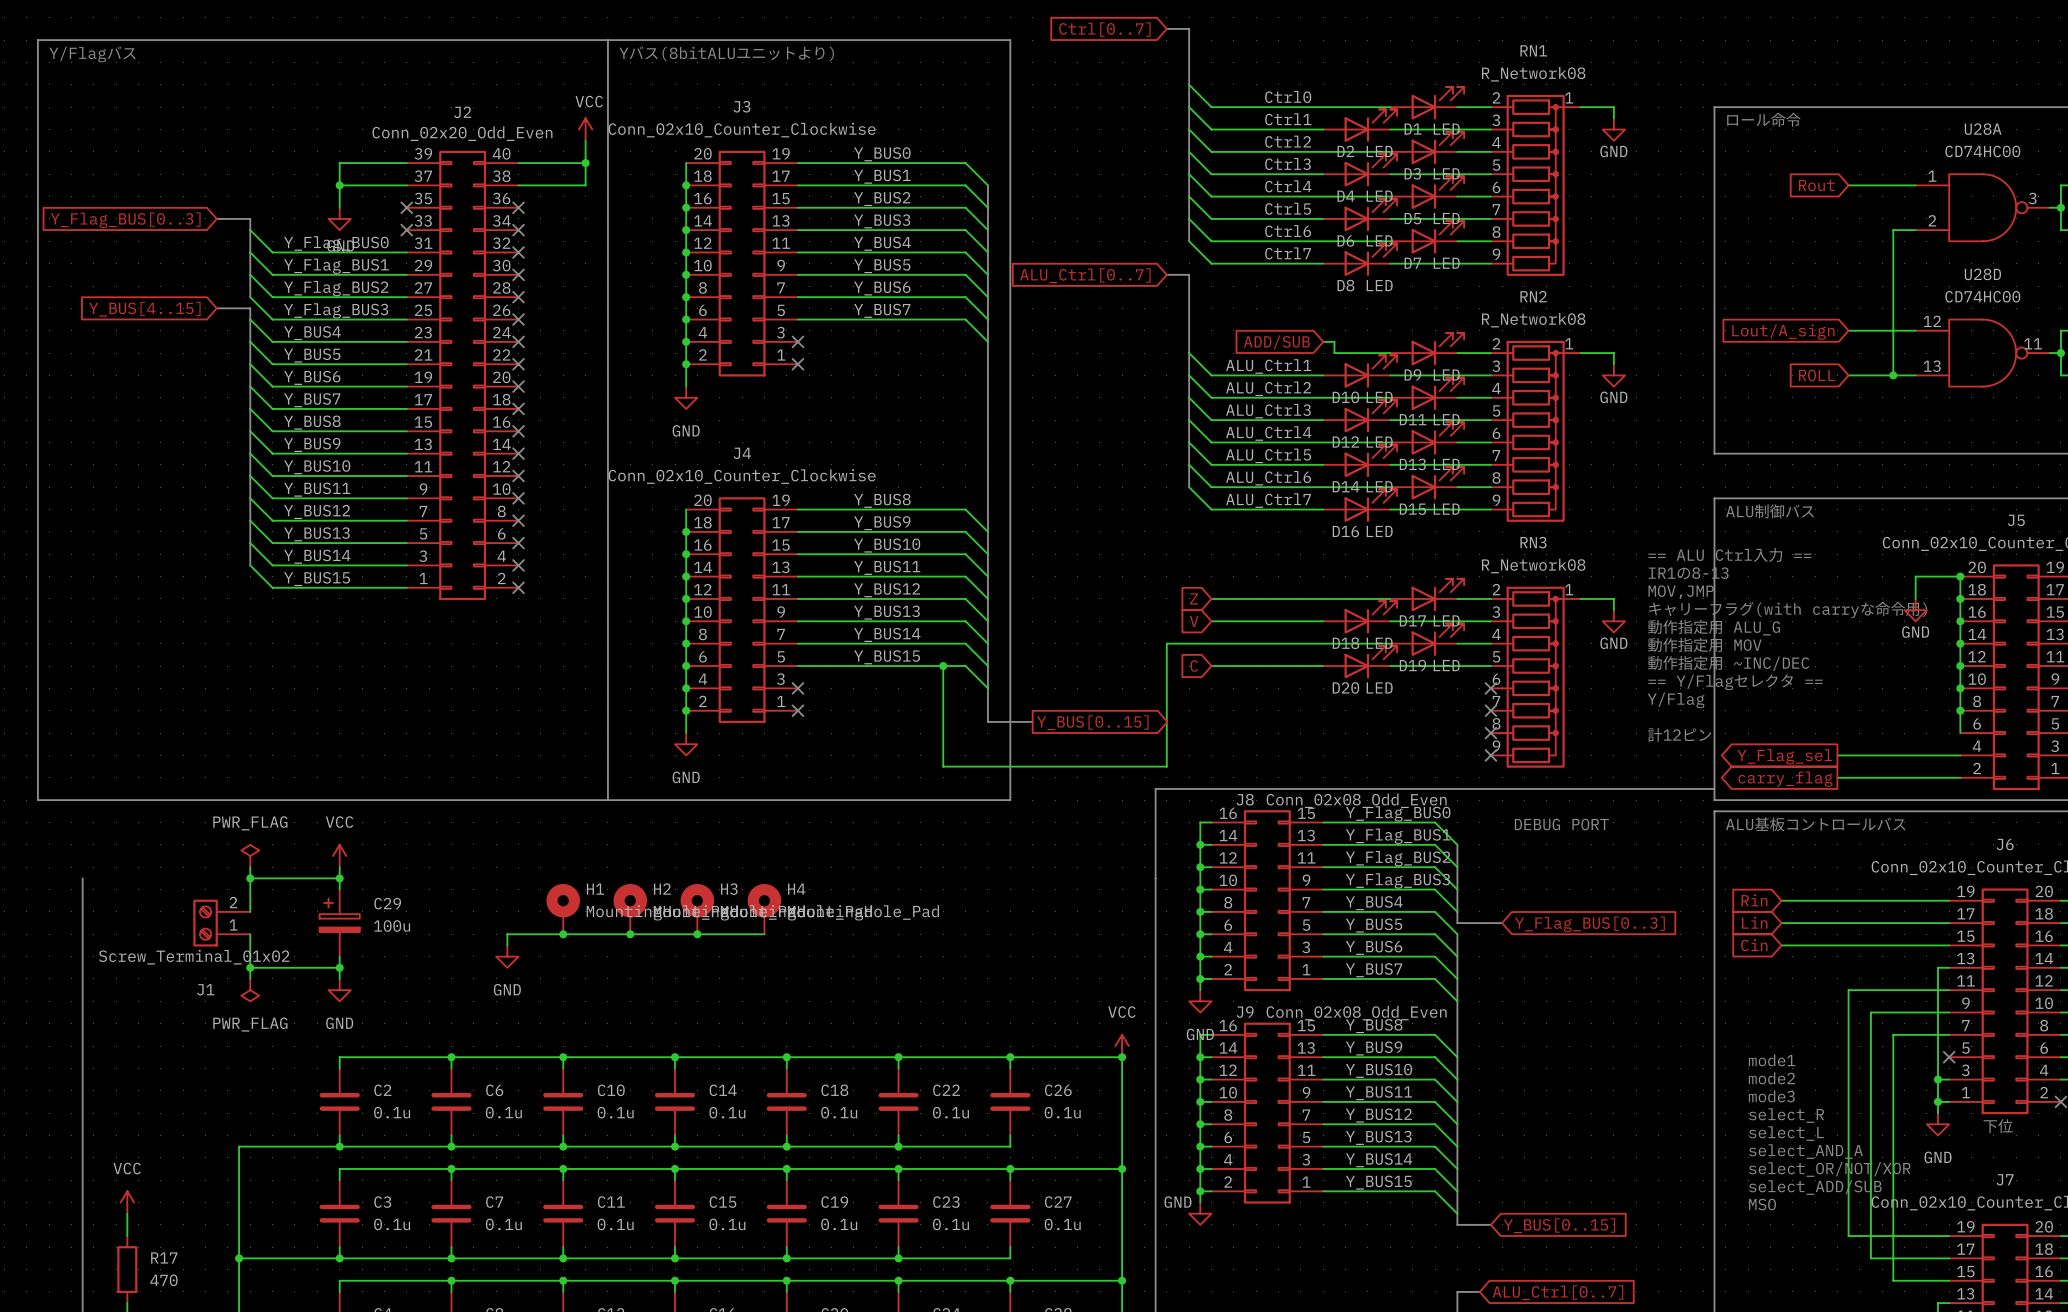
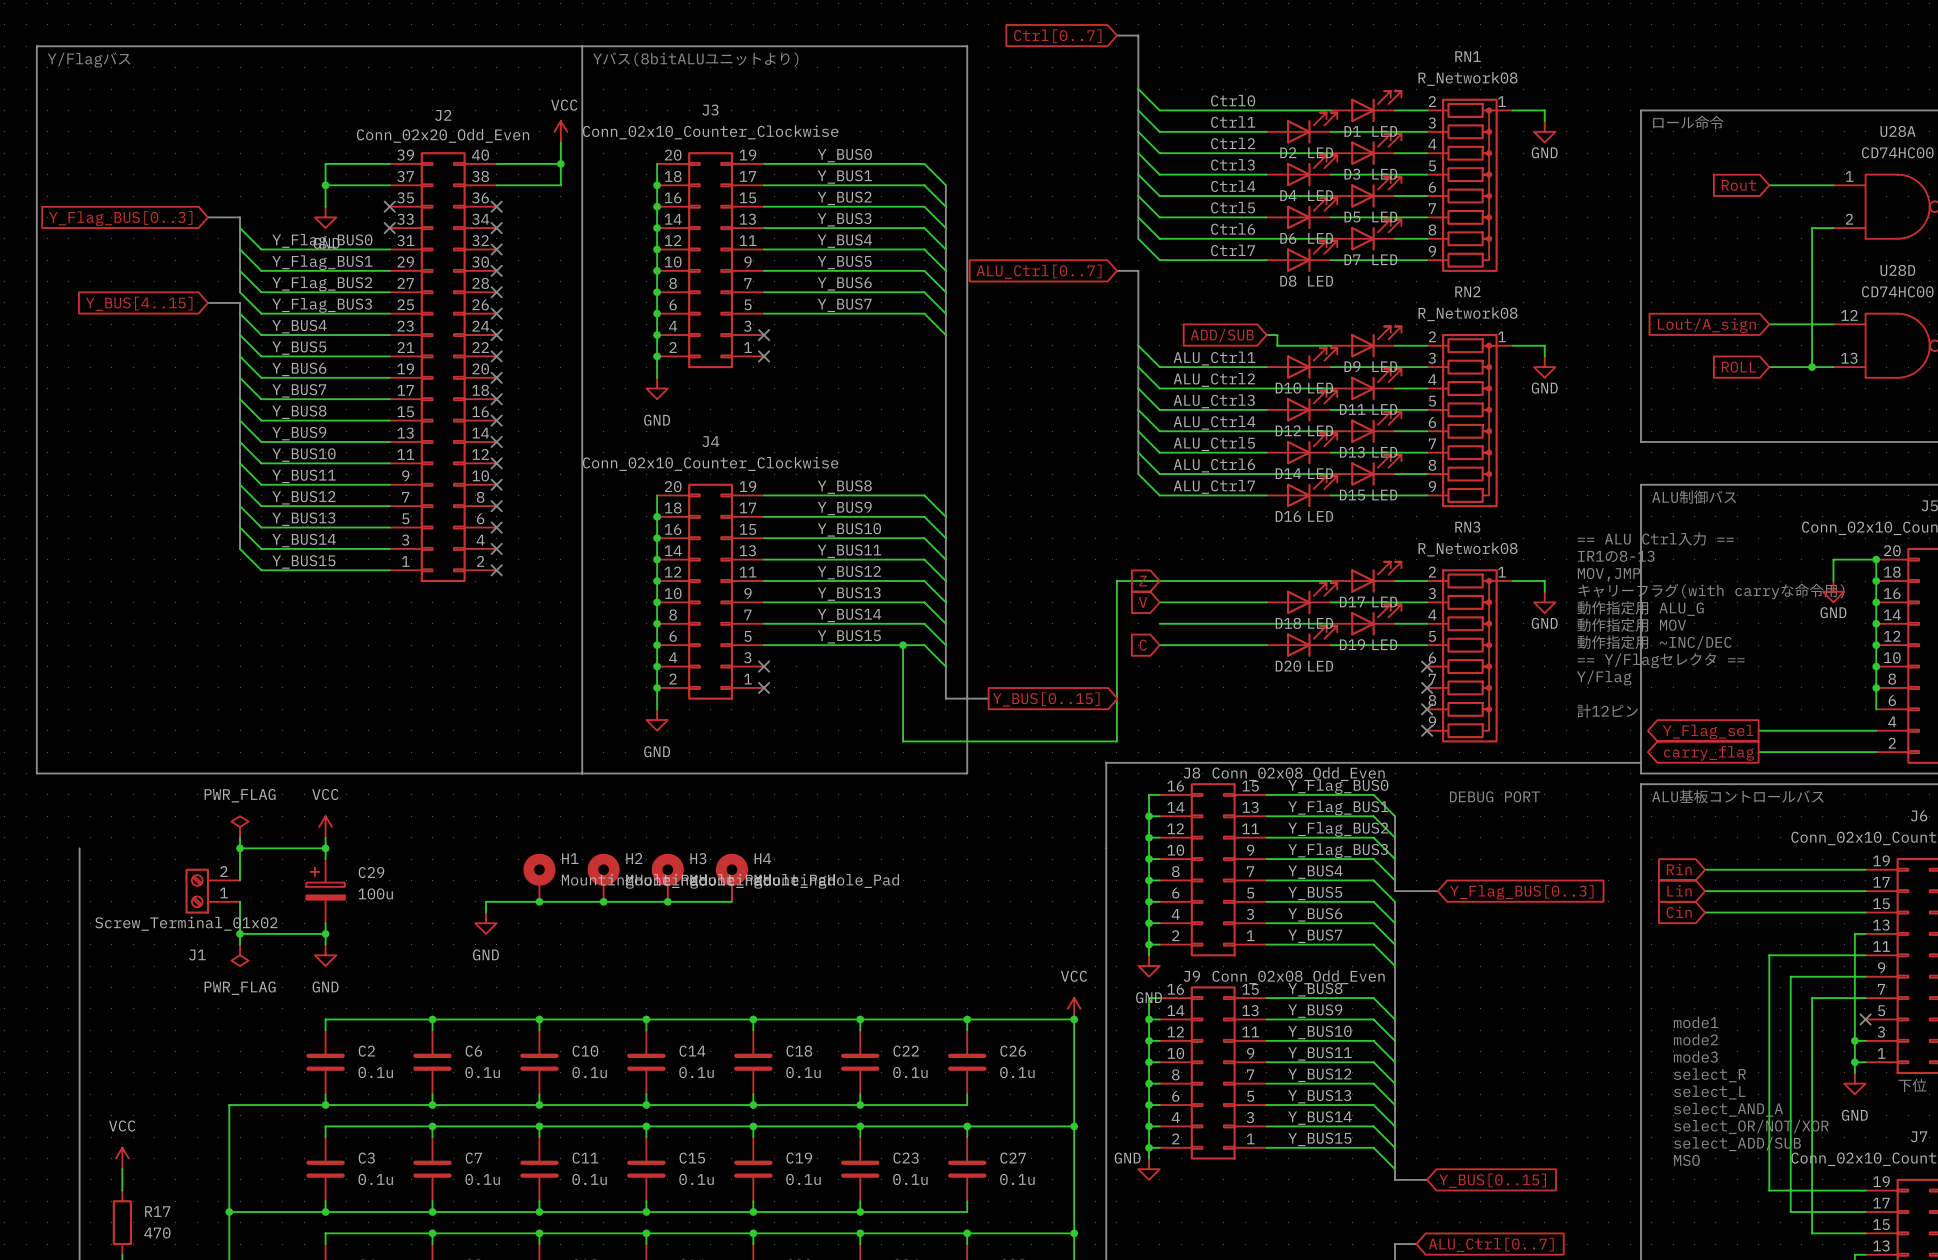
wire: (1166, 643) (1211, 643) -> (1116, 623) (1116, 581) (1159, 581)

